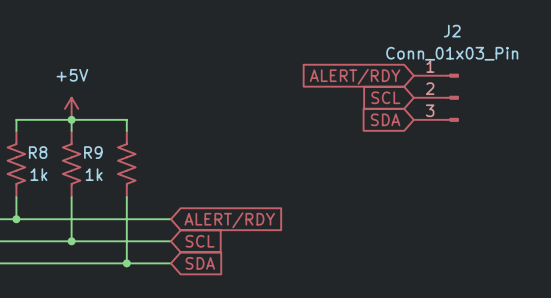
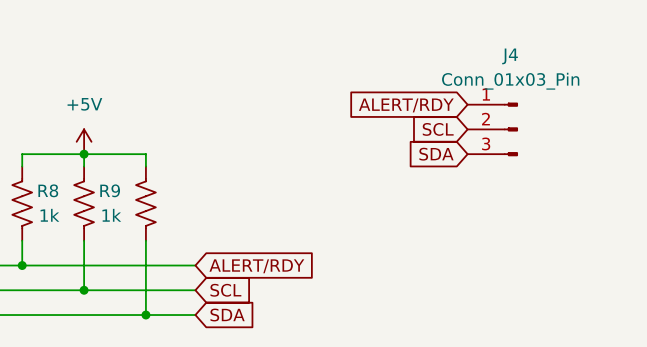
J2 name: J2 (452, 31) -> J4 (510, 56)

